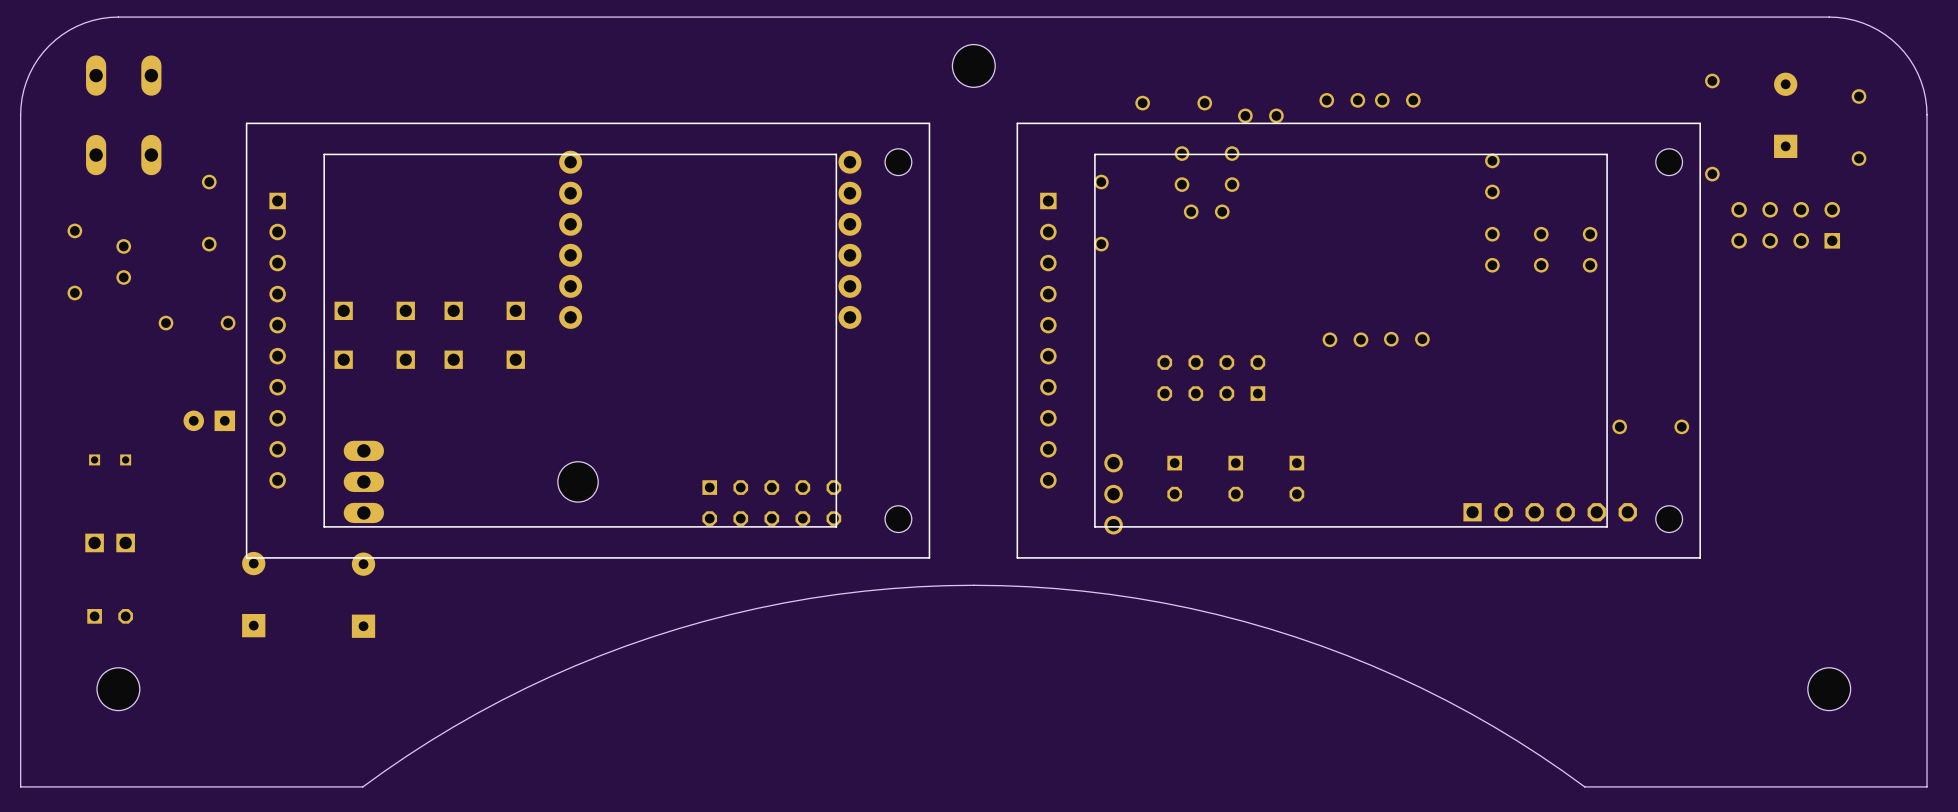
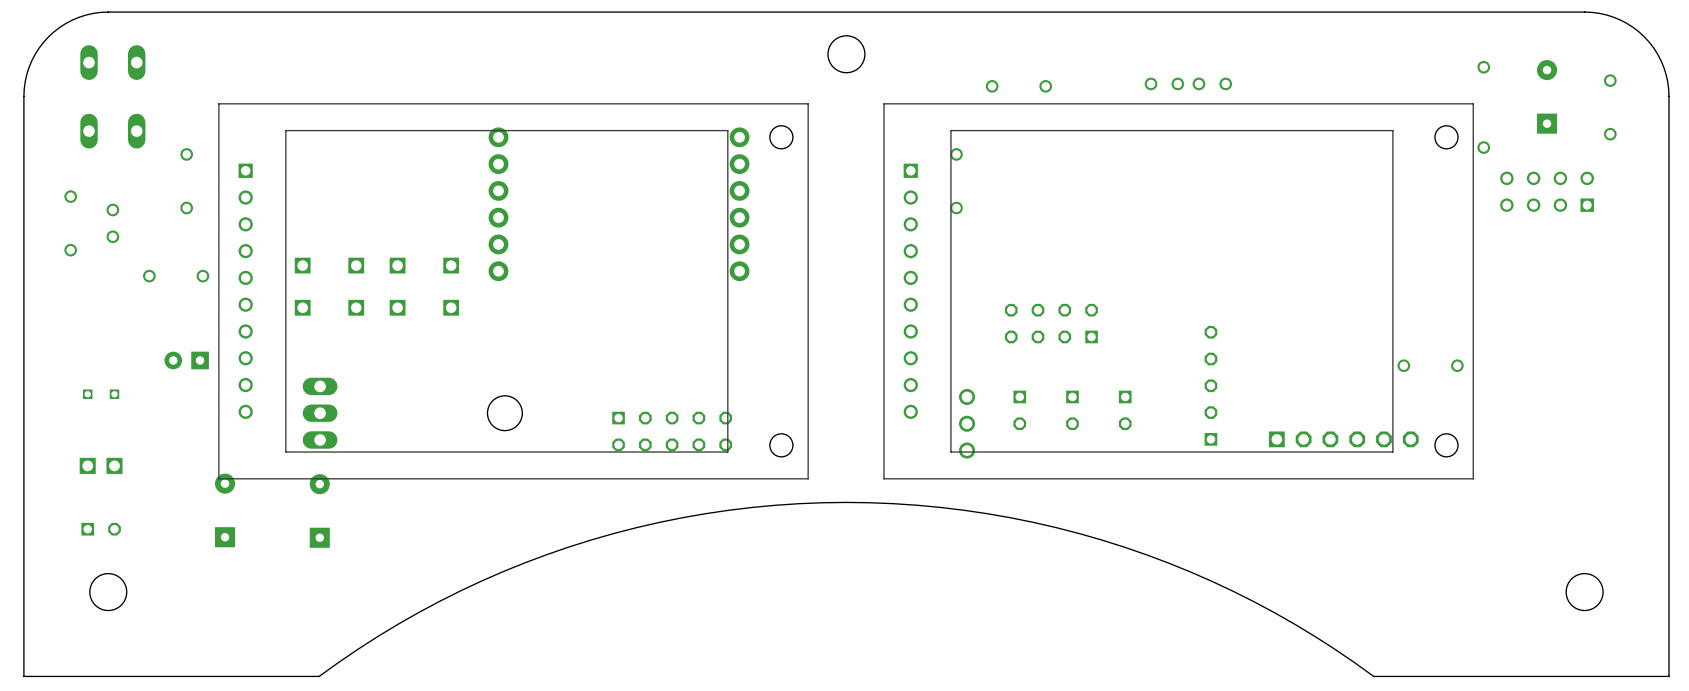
part: (1260, 115) -> none
part: (1182, 169) -> none
part: (1232, 169) -> none
part: (1492, 176) -> none
part: (1206, 211) -> none
part: (1492, 249) -> none
part: (1541, 249) -> none
part: (1590, 249) -> none
part: (1345, 339) -> none
part: (1406, 339) -> none
part: none -> (1210, 385)

